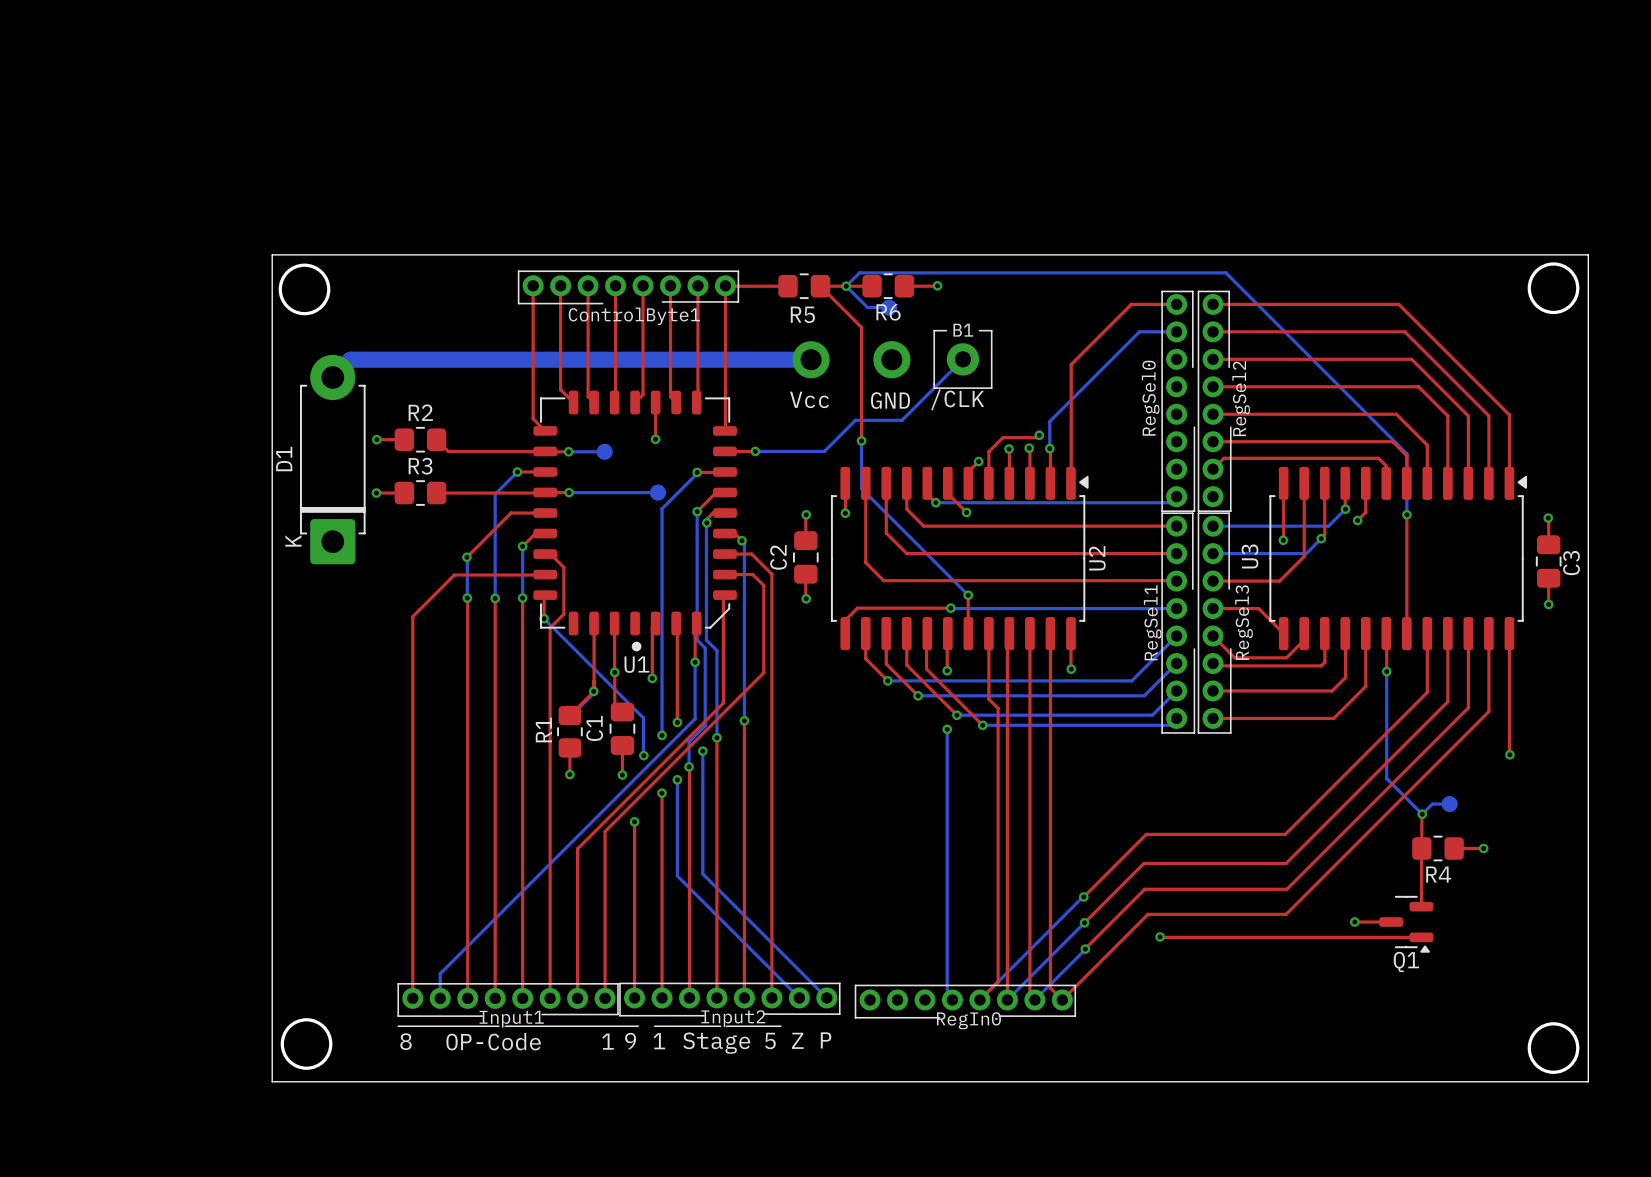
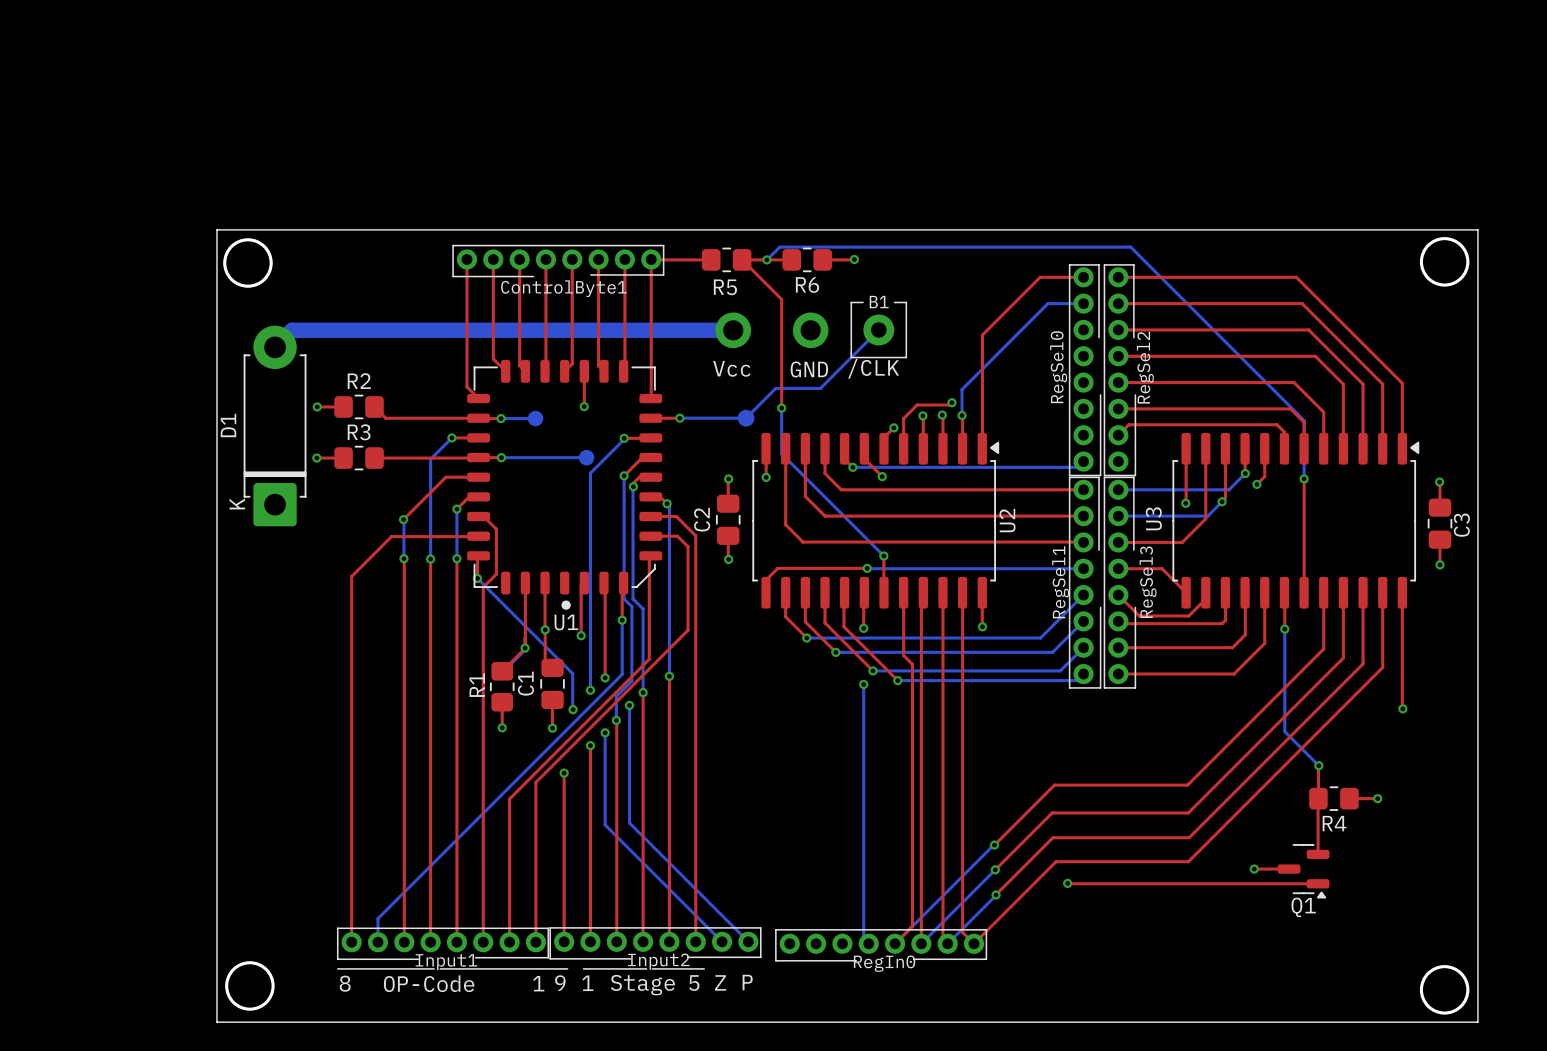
bottom track: (846, 286) (867, 307) (889, 307) -> none
part: (889, 307) -> none
drawing: none -> [737, 409, 755, 427]
bottom track: (1449, 804) (1432, 804) (1422, 814) -> none
part: (1449, 804) -> none

